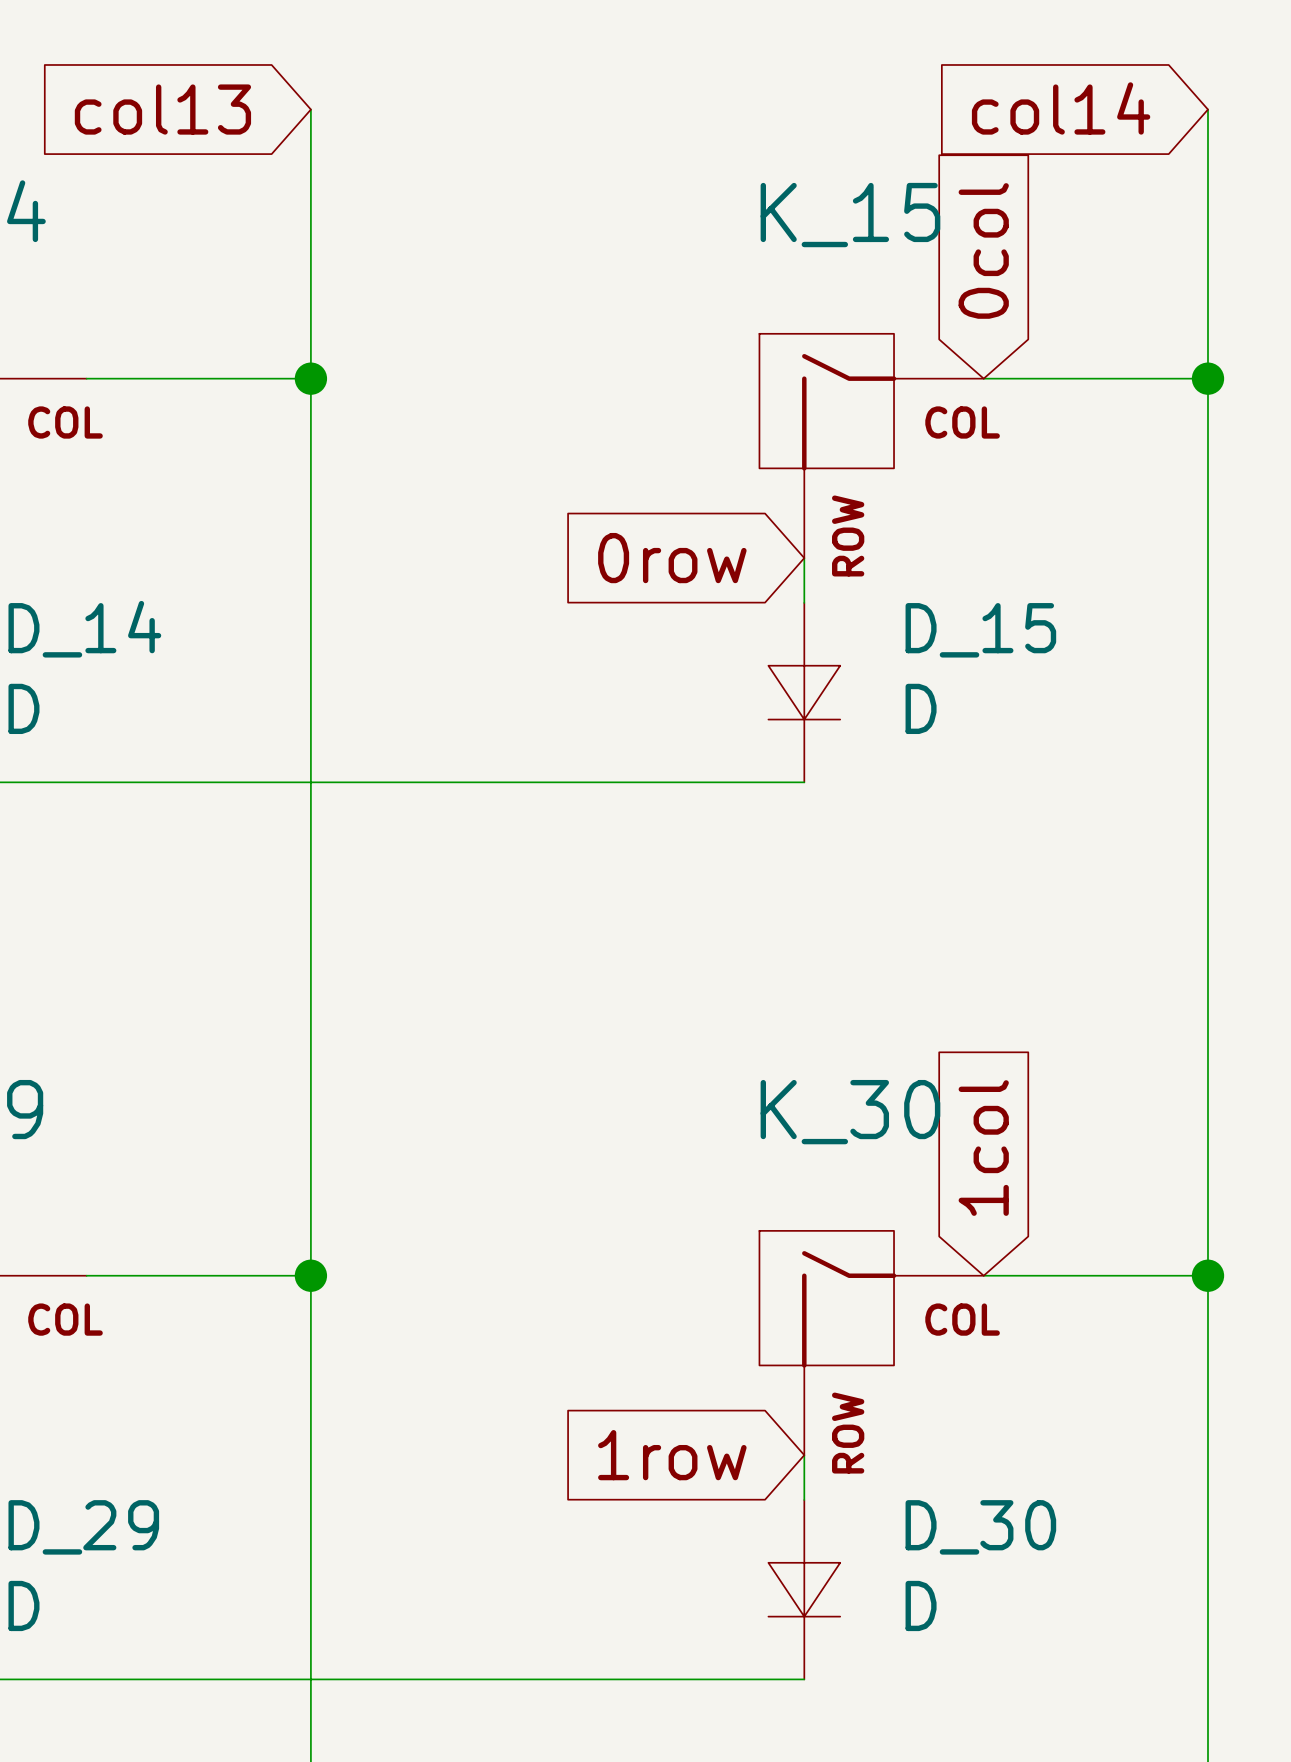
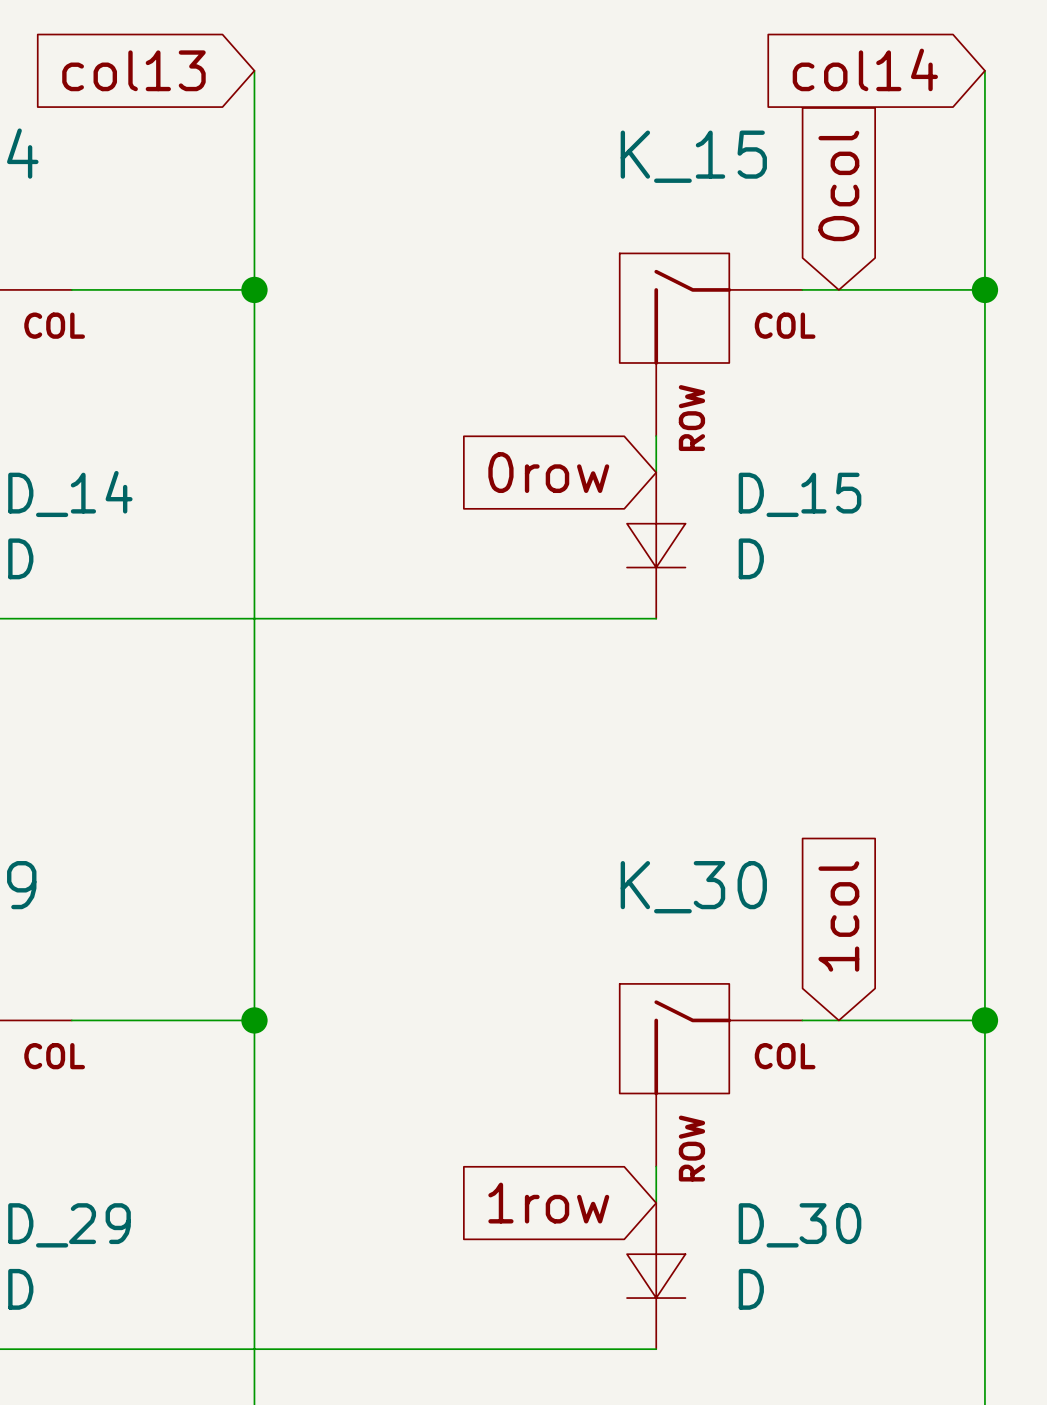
global label position: 0col (983, 250) -> 0col (838, 185)
global label position: 0row (672, 558) -> 0row (548, 472)
global label position: 1col (983, 1148) -> 1col (838, 916)
global label position: 1row (672, 1455) -> 1row (548, 1203)

